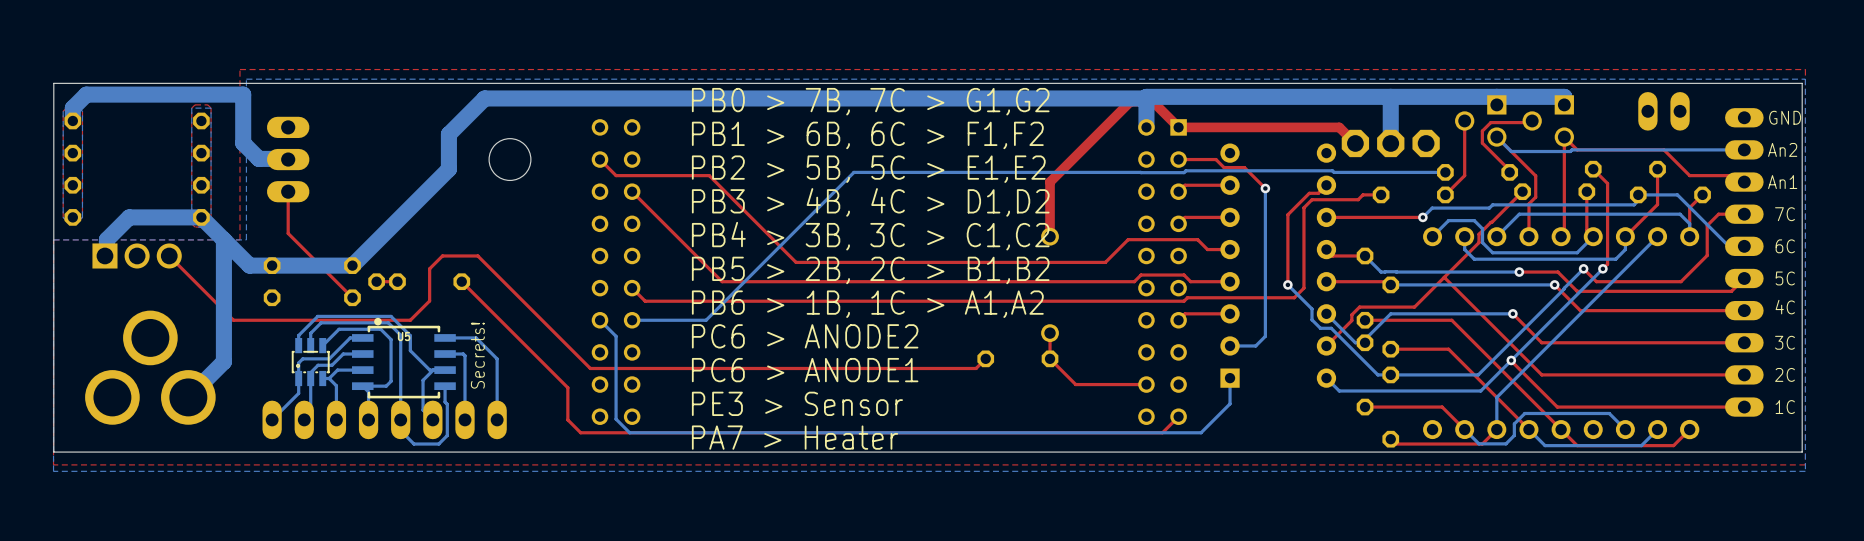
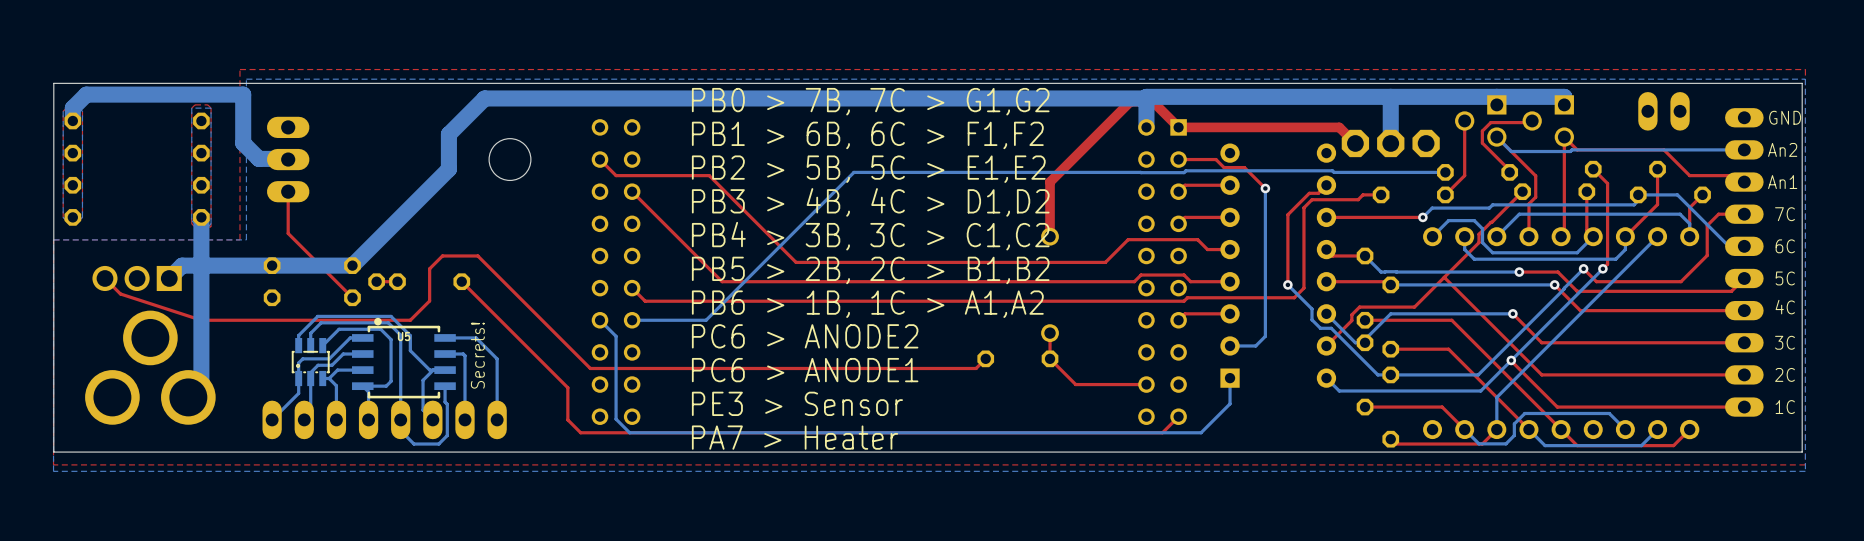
bottom track: (223, 239) (223, 361) (201, 384) -> (201, 217) (201, 384)
bottom track: (104, 255) (106, 254) (106, 239) (129, 217) (201, 217) (249, 265) -> (169, 278) (182, 265) (249, 265)
part rotation: 0° (137, 255) -> 180° (137, 278)
top track: (169, 255) (233, 320) -> (104, 278) (120, 293) (201, 320) (233, 320)

